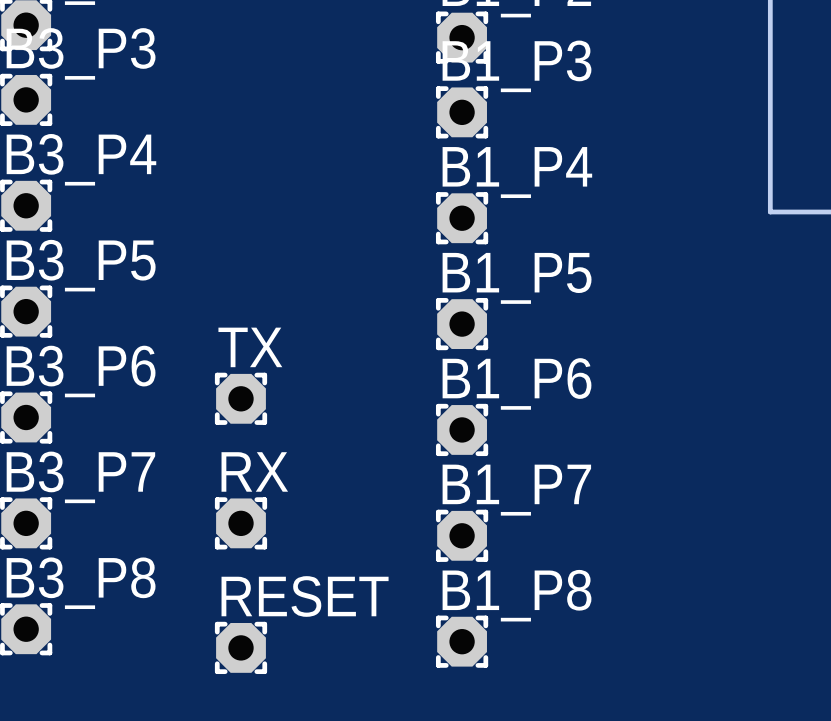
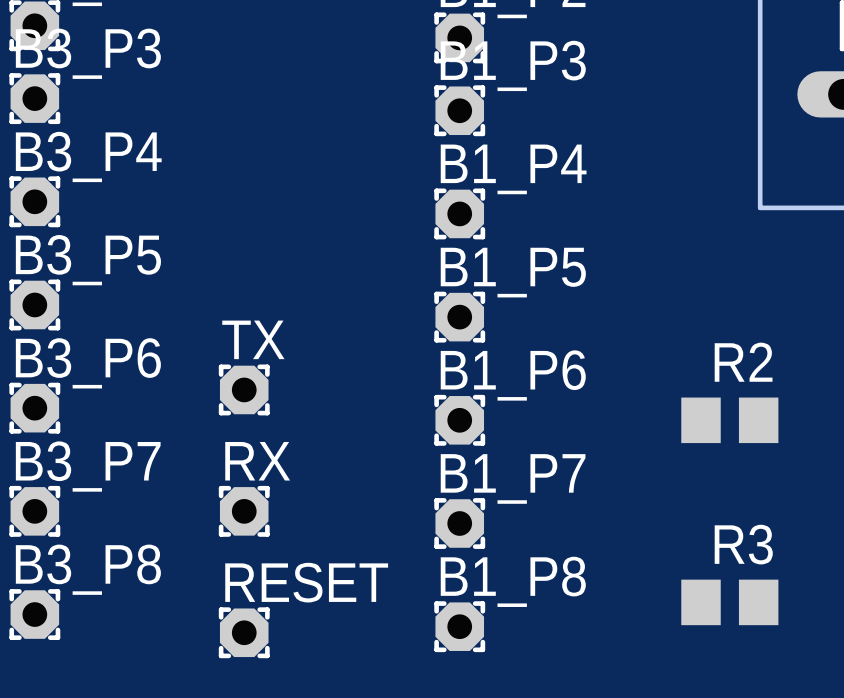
R2: none -> (729, 420)
R3: none -> (729, 602)

